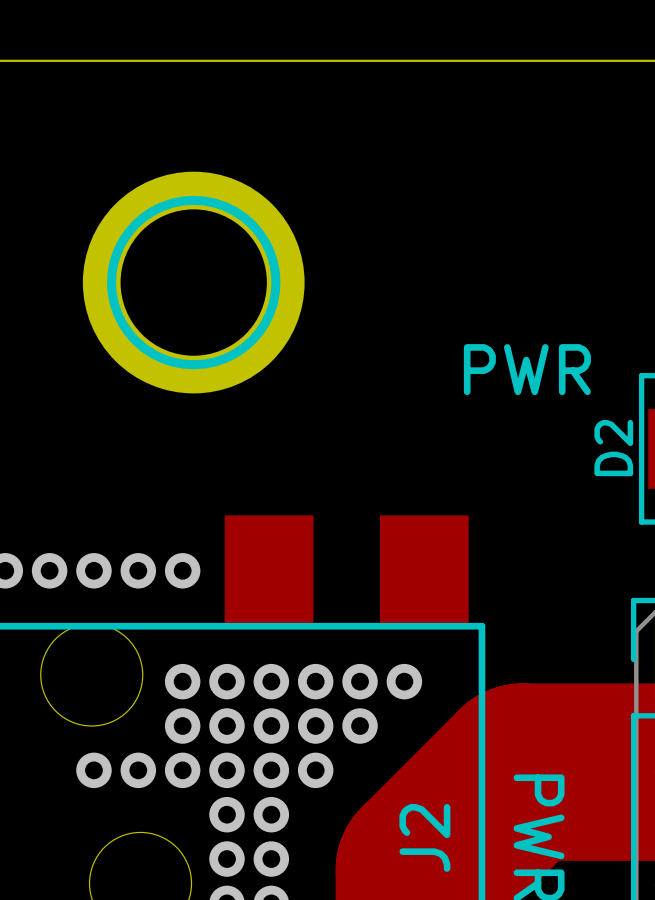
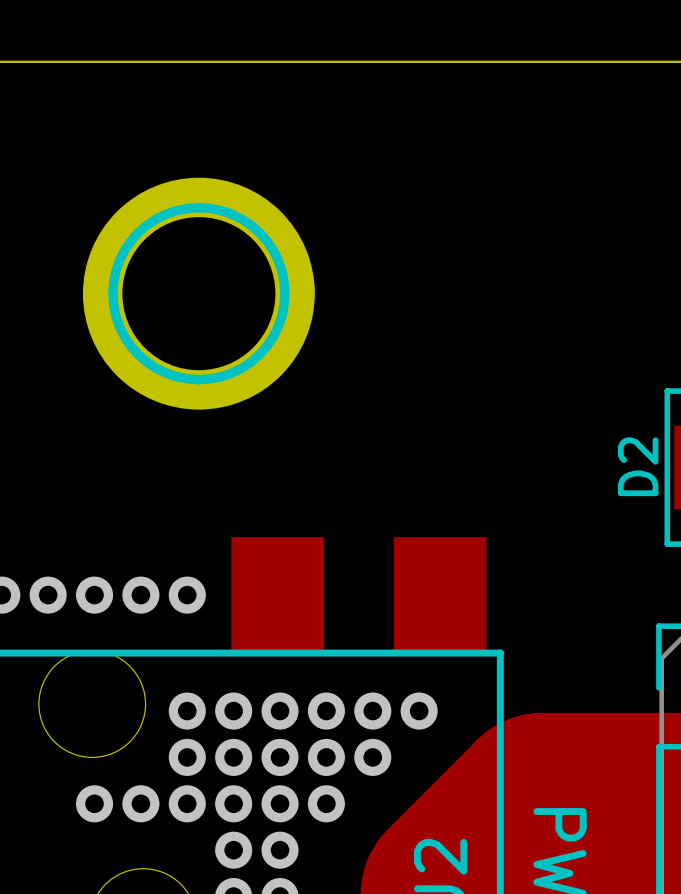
text: PWR (527, 369) -> none

